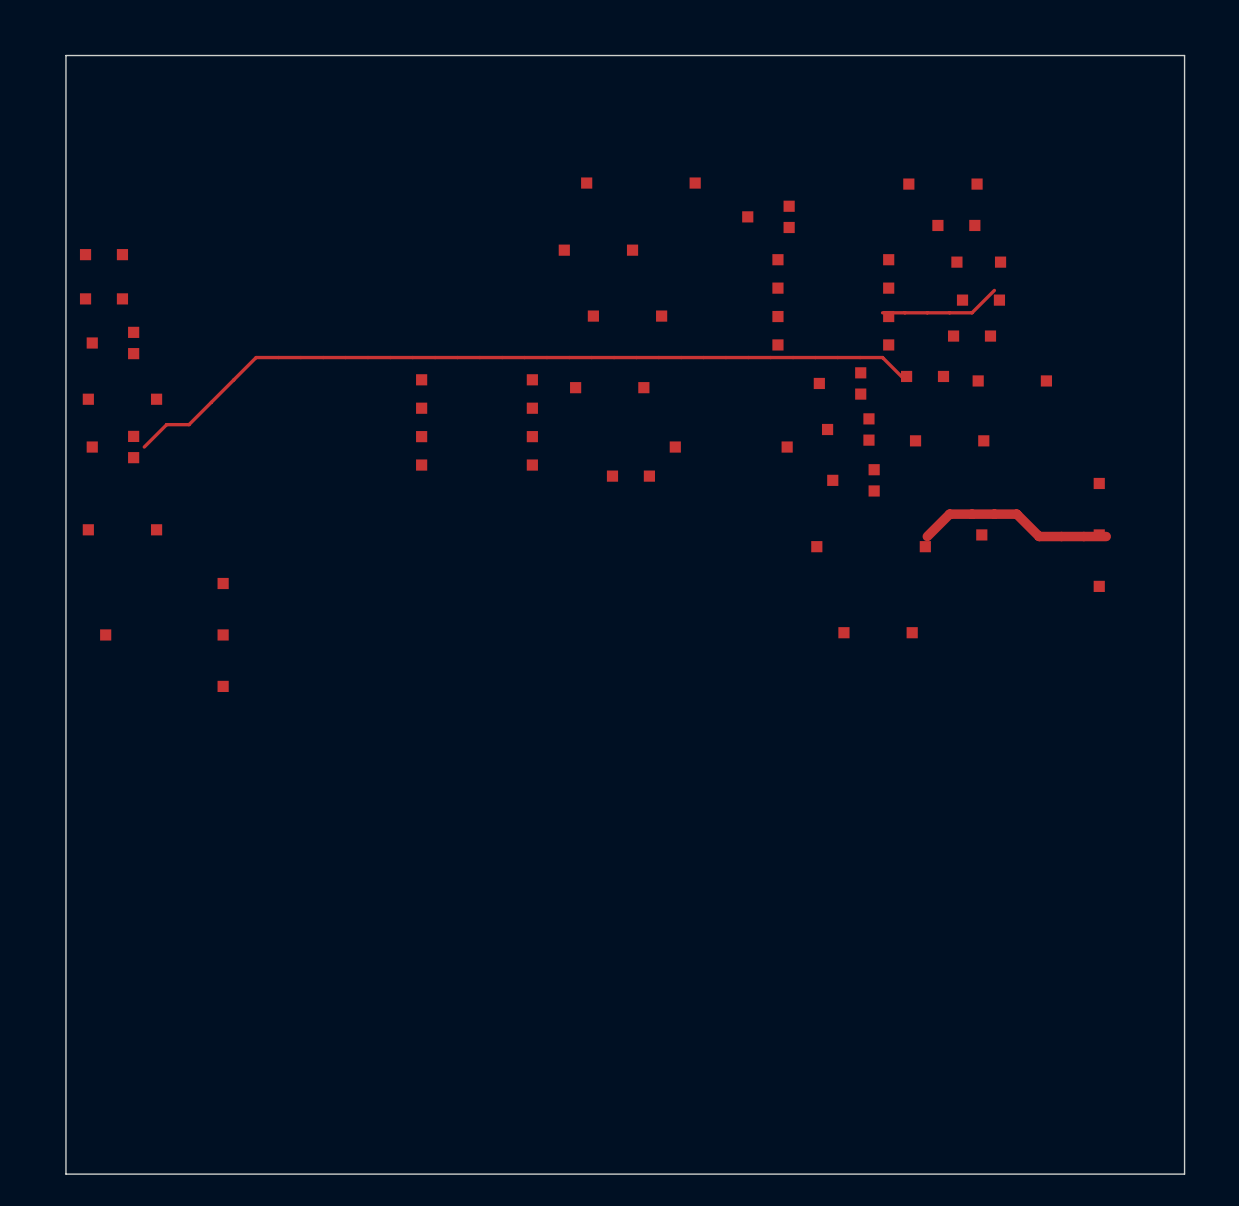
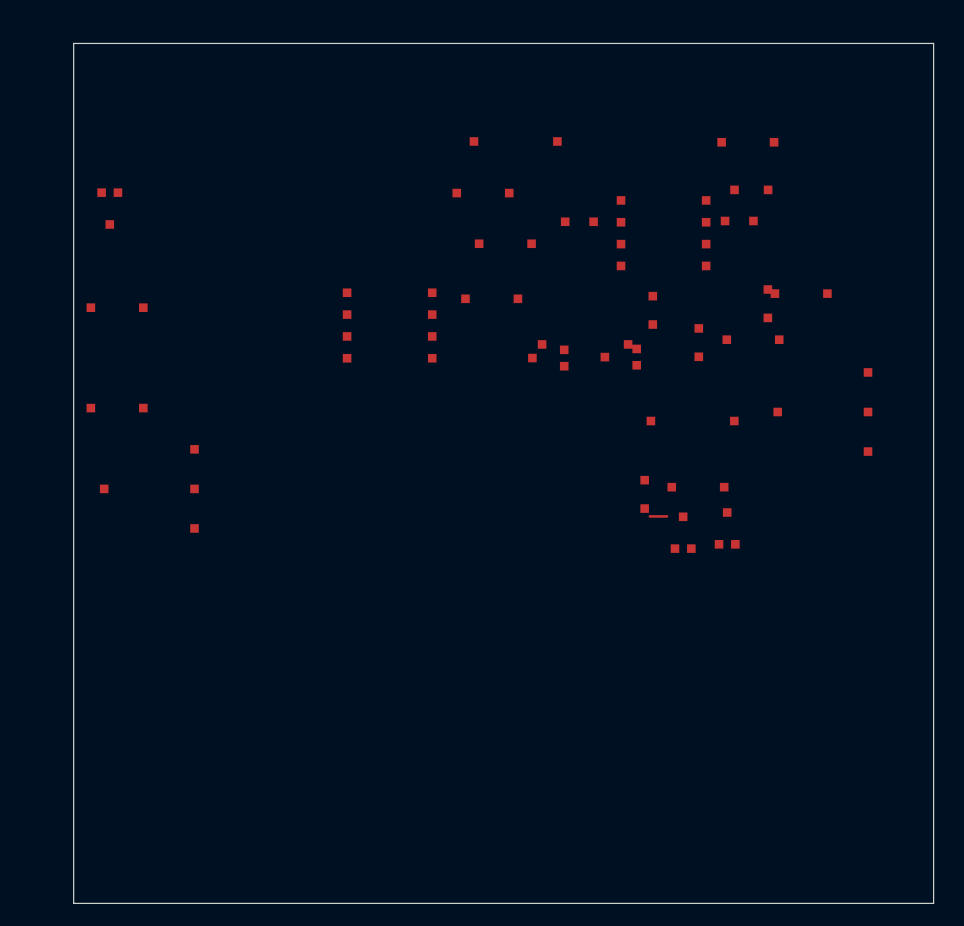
part: (768, 216) -> none
part: (956, 225) -> none
part: (104, 254) -> none
part position: (978, 262) -> (751, 189)
part: none -> (739, 220)
part: none -> (579, 221)
top track: (994, 290) (972, 312) (882, 312) -> none
part: (104, 298) -> none
part: (980, 300) -> none
part: (972, 336) -> none
part rotation: 0° (112, 342) -> 90° counterclockwise (109, 208)
part position: (112, 342) -> (109, 208)
part: (925, 376) -> none
top track: (904, 379) (882, 357) (256, 357) (189, 424) (166, 424) (144, 447) -> none
part: (840, 383) -> none
part: none -> (767, 303)
part: none -> (652, 310)
part: (848, 429) -> none
part: none -> (698, 342)
part: (112, 447) -> none
part: none -> (620, 357)
part: none -> (548, 358)
part: (630, 476) -> none
part: (853, 480) -> none
top track: (1106, 536) (1039, 536) (1016, 514) (949, 514) (927, 536) -> none
part: none -> (644, 494)
top track: none -> (667, 516) (649, 516)
part: none -> (727, 528)
part: none -> (683, 532)

